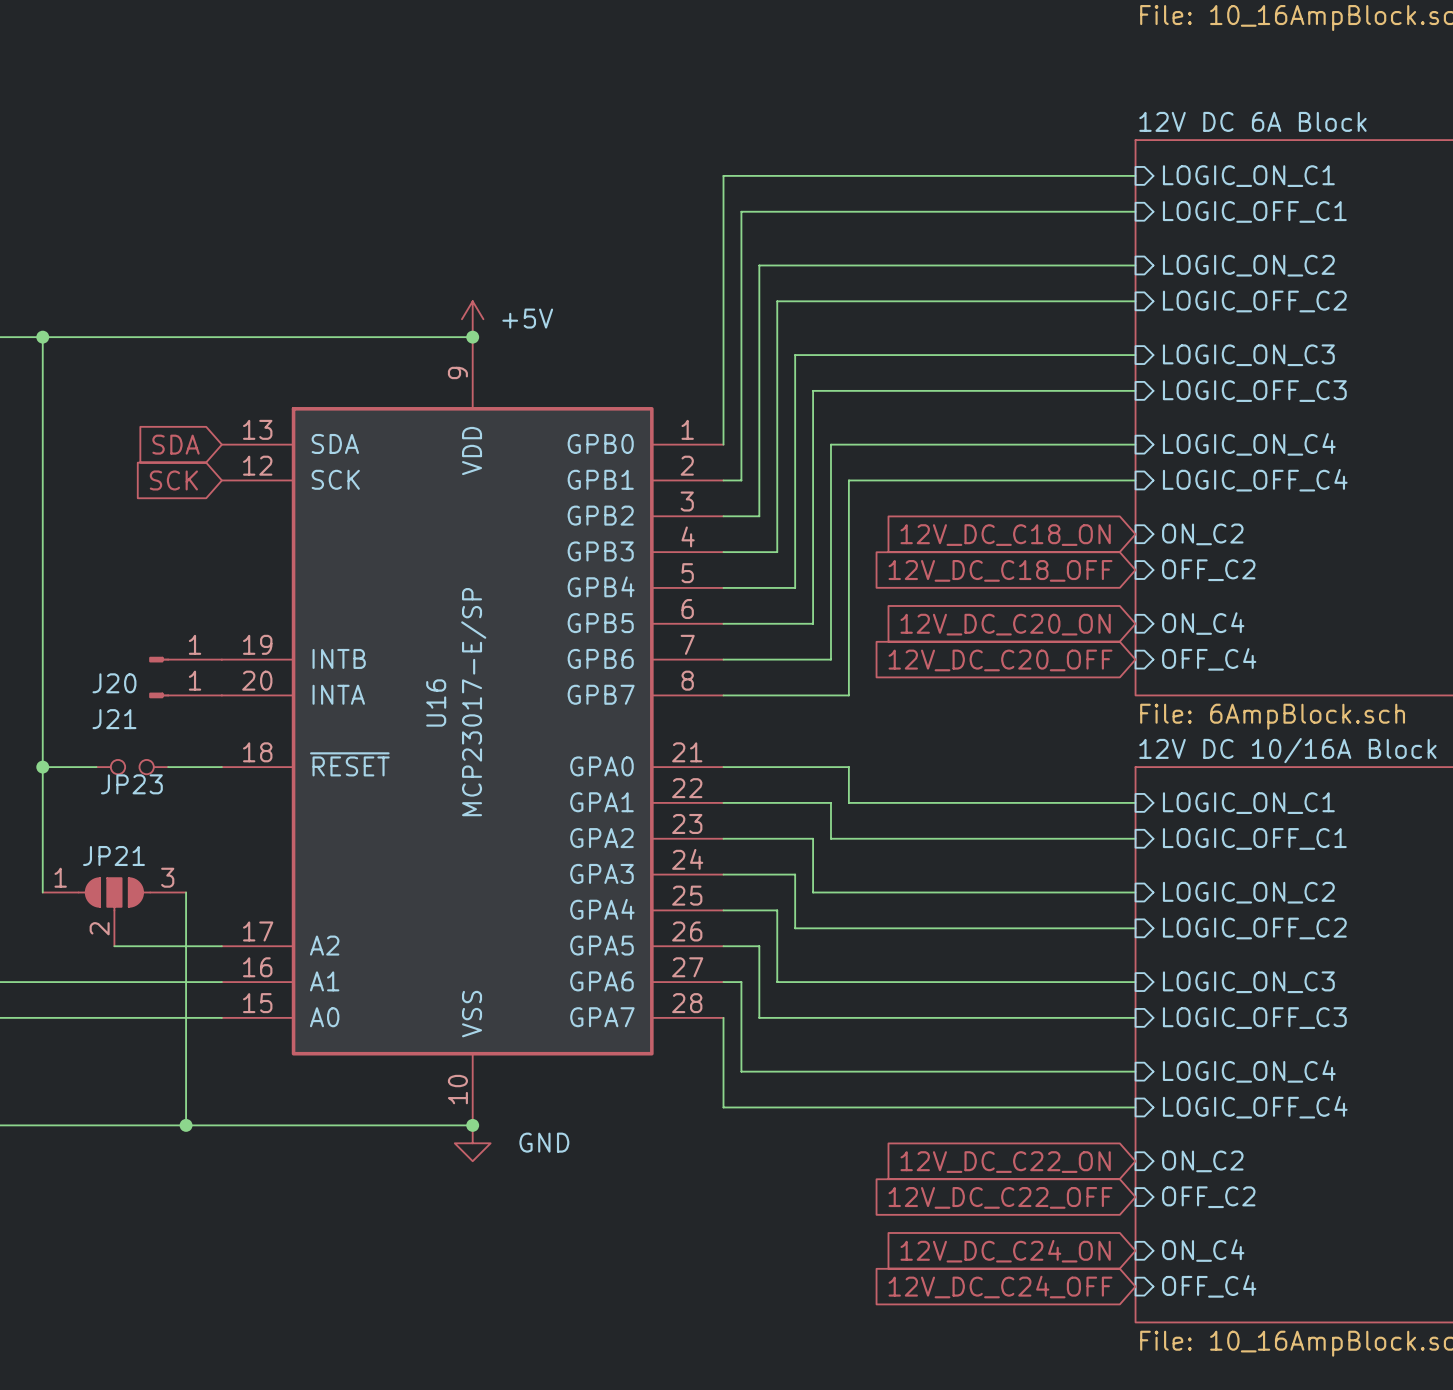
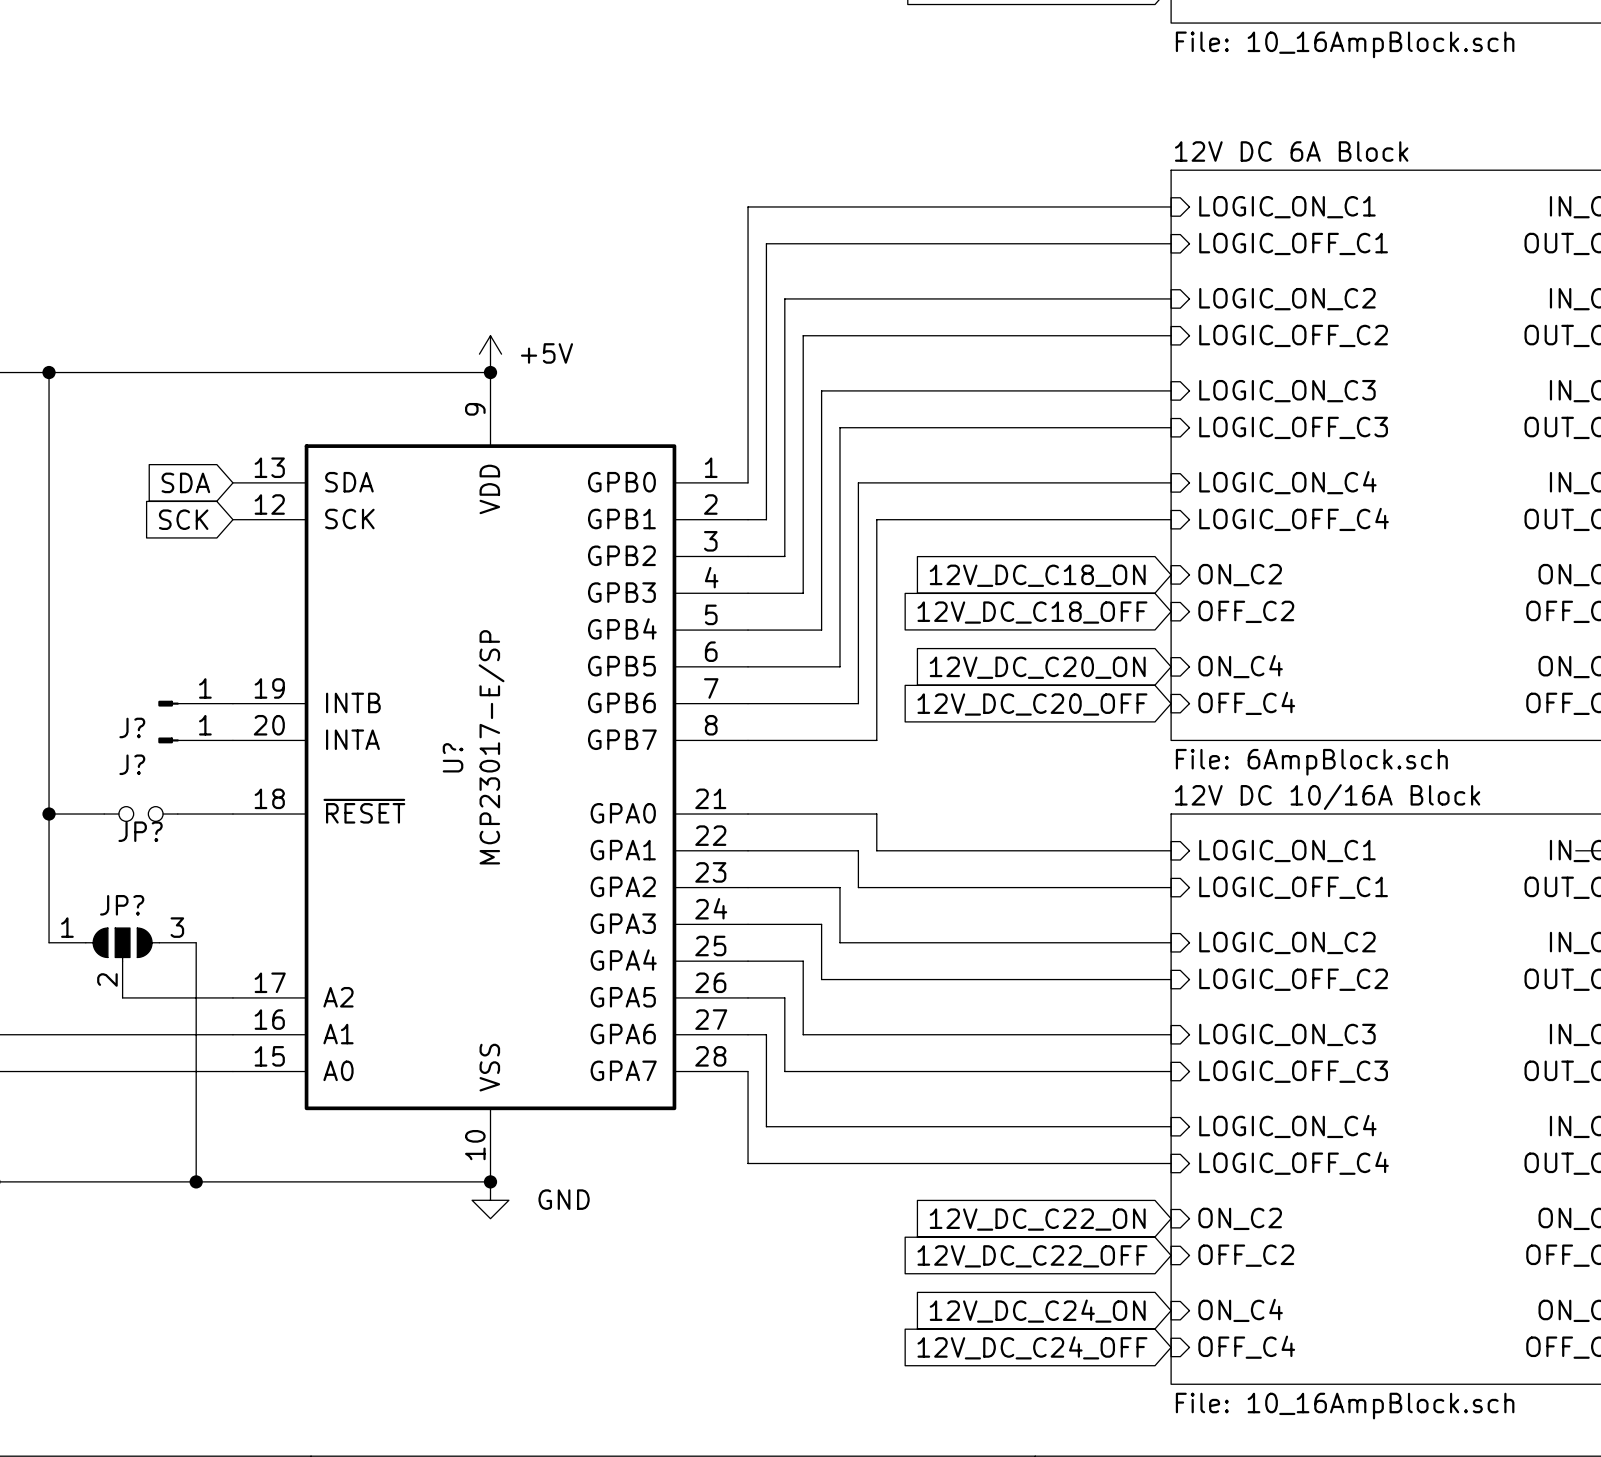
J20 name: J20 (114, 683) -> J? (132, 727)
U16 name: U16 (436, 702) -> U? (453, 757)
J21 name: J21 (114, 719) -> J? (132, 764)
JP23 name: JP23 (131, 784) -> JP? (140, 831)
JP21 name: JP21 (113, 856) -> JP? (122, 905)

